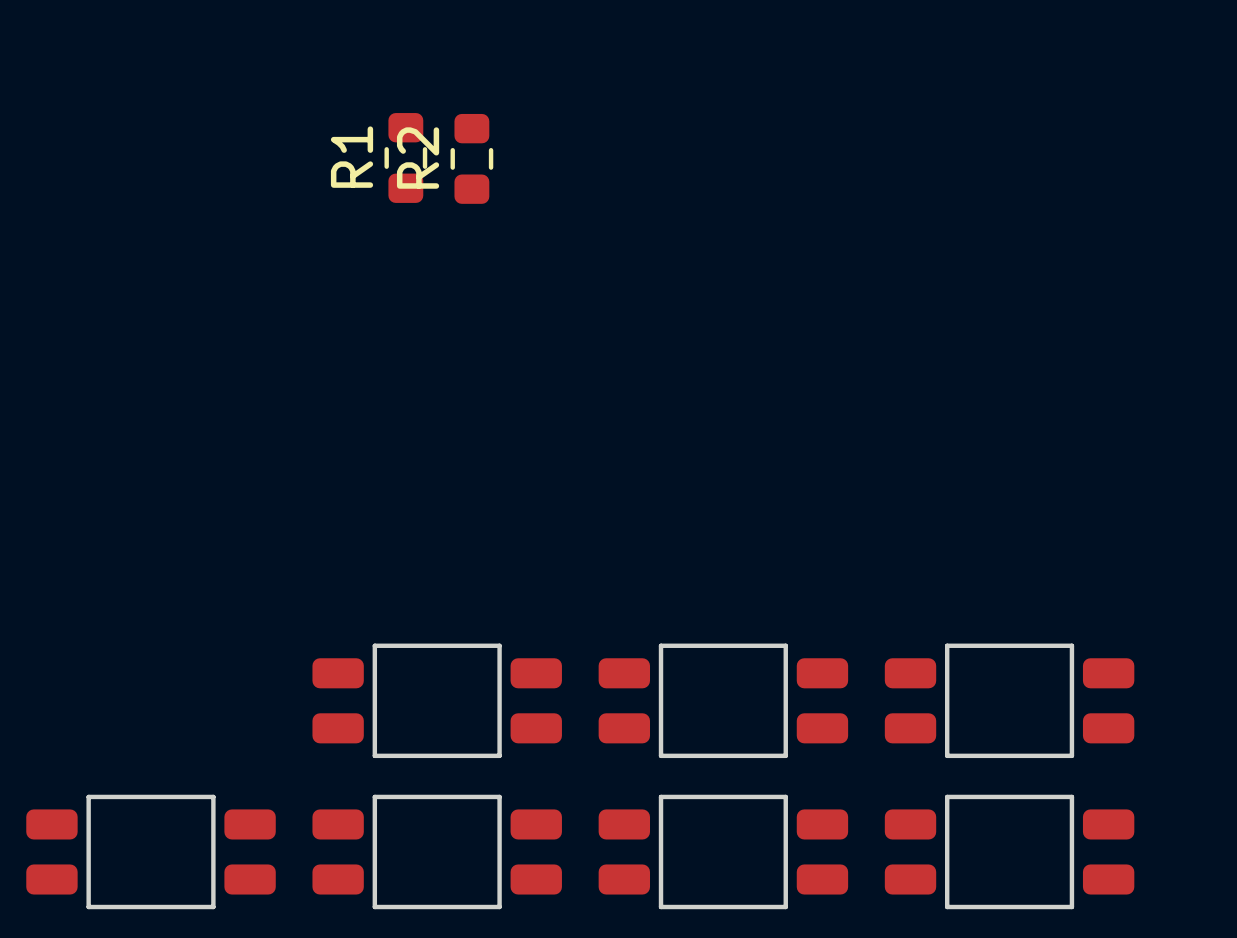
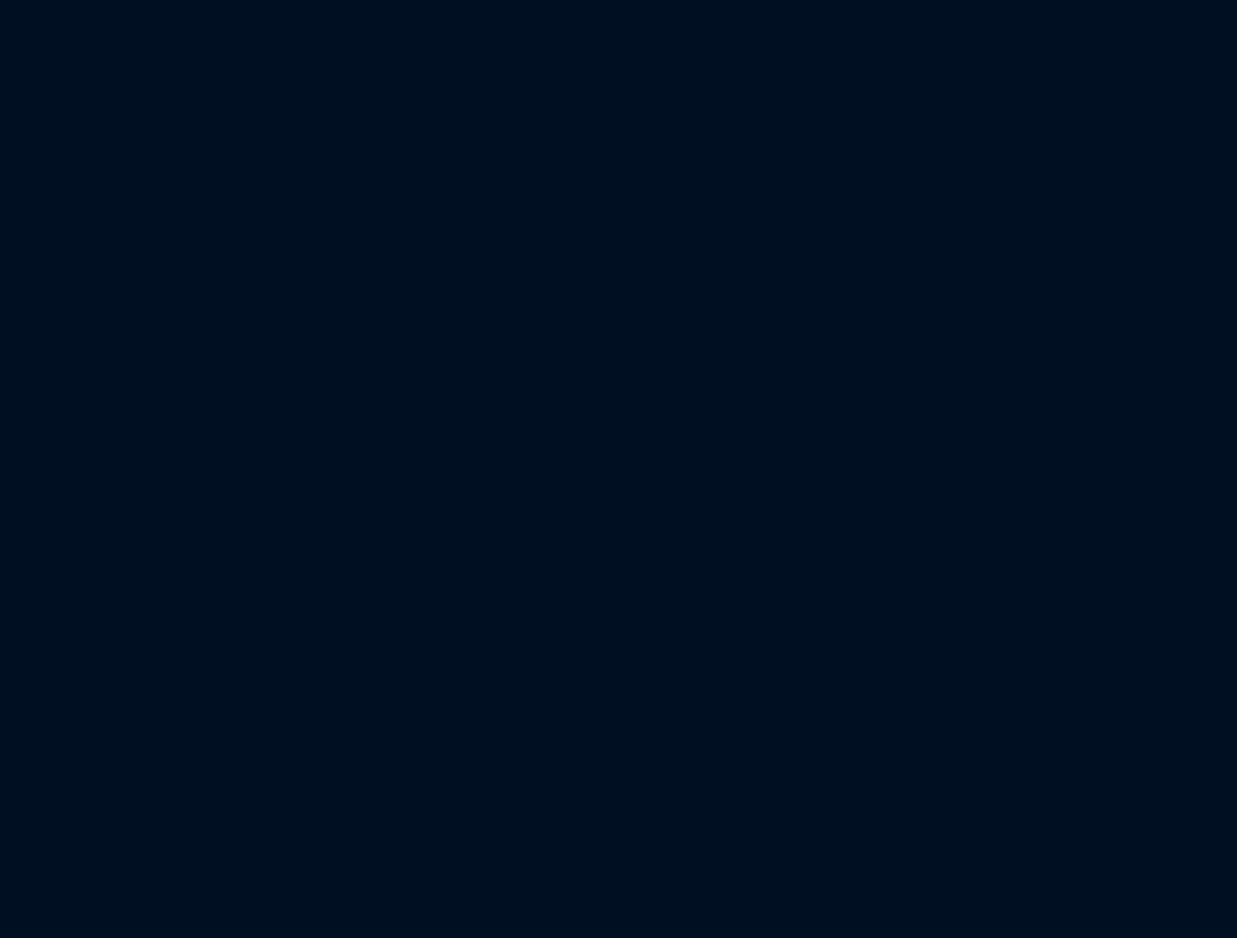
R1: (405, 157) -> none
R2: (471, 158) -> none
part: (437, 700) -> none
part: (723, 700) -> none
part: (1009, 700) -> none
part: (151, 851) -> none
part: (437, 851) -> none
part: (723, 851) -> none
part: (1009, 851) -> none

